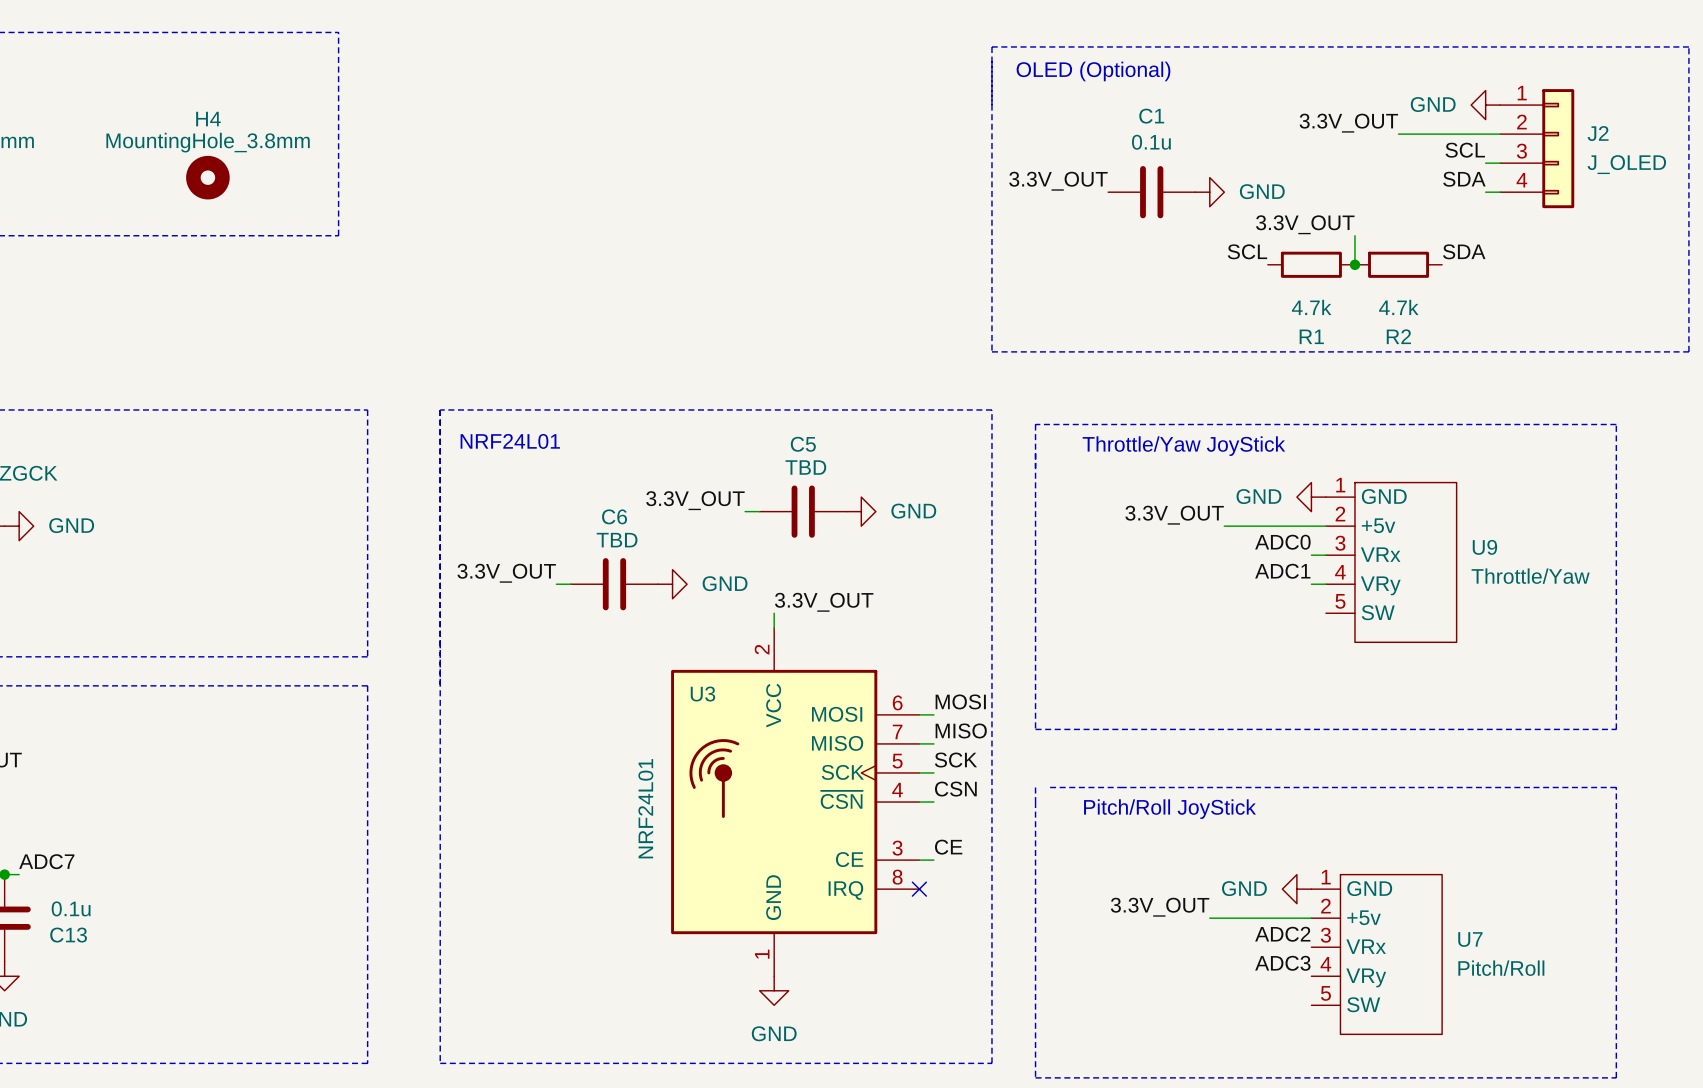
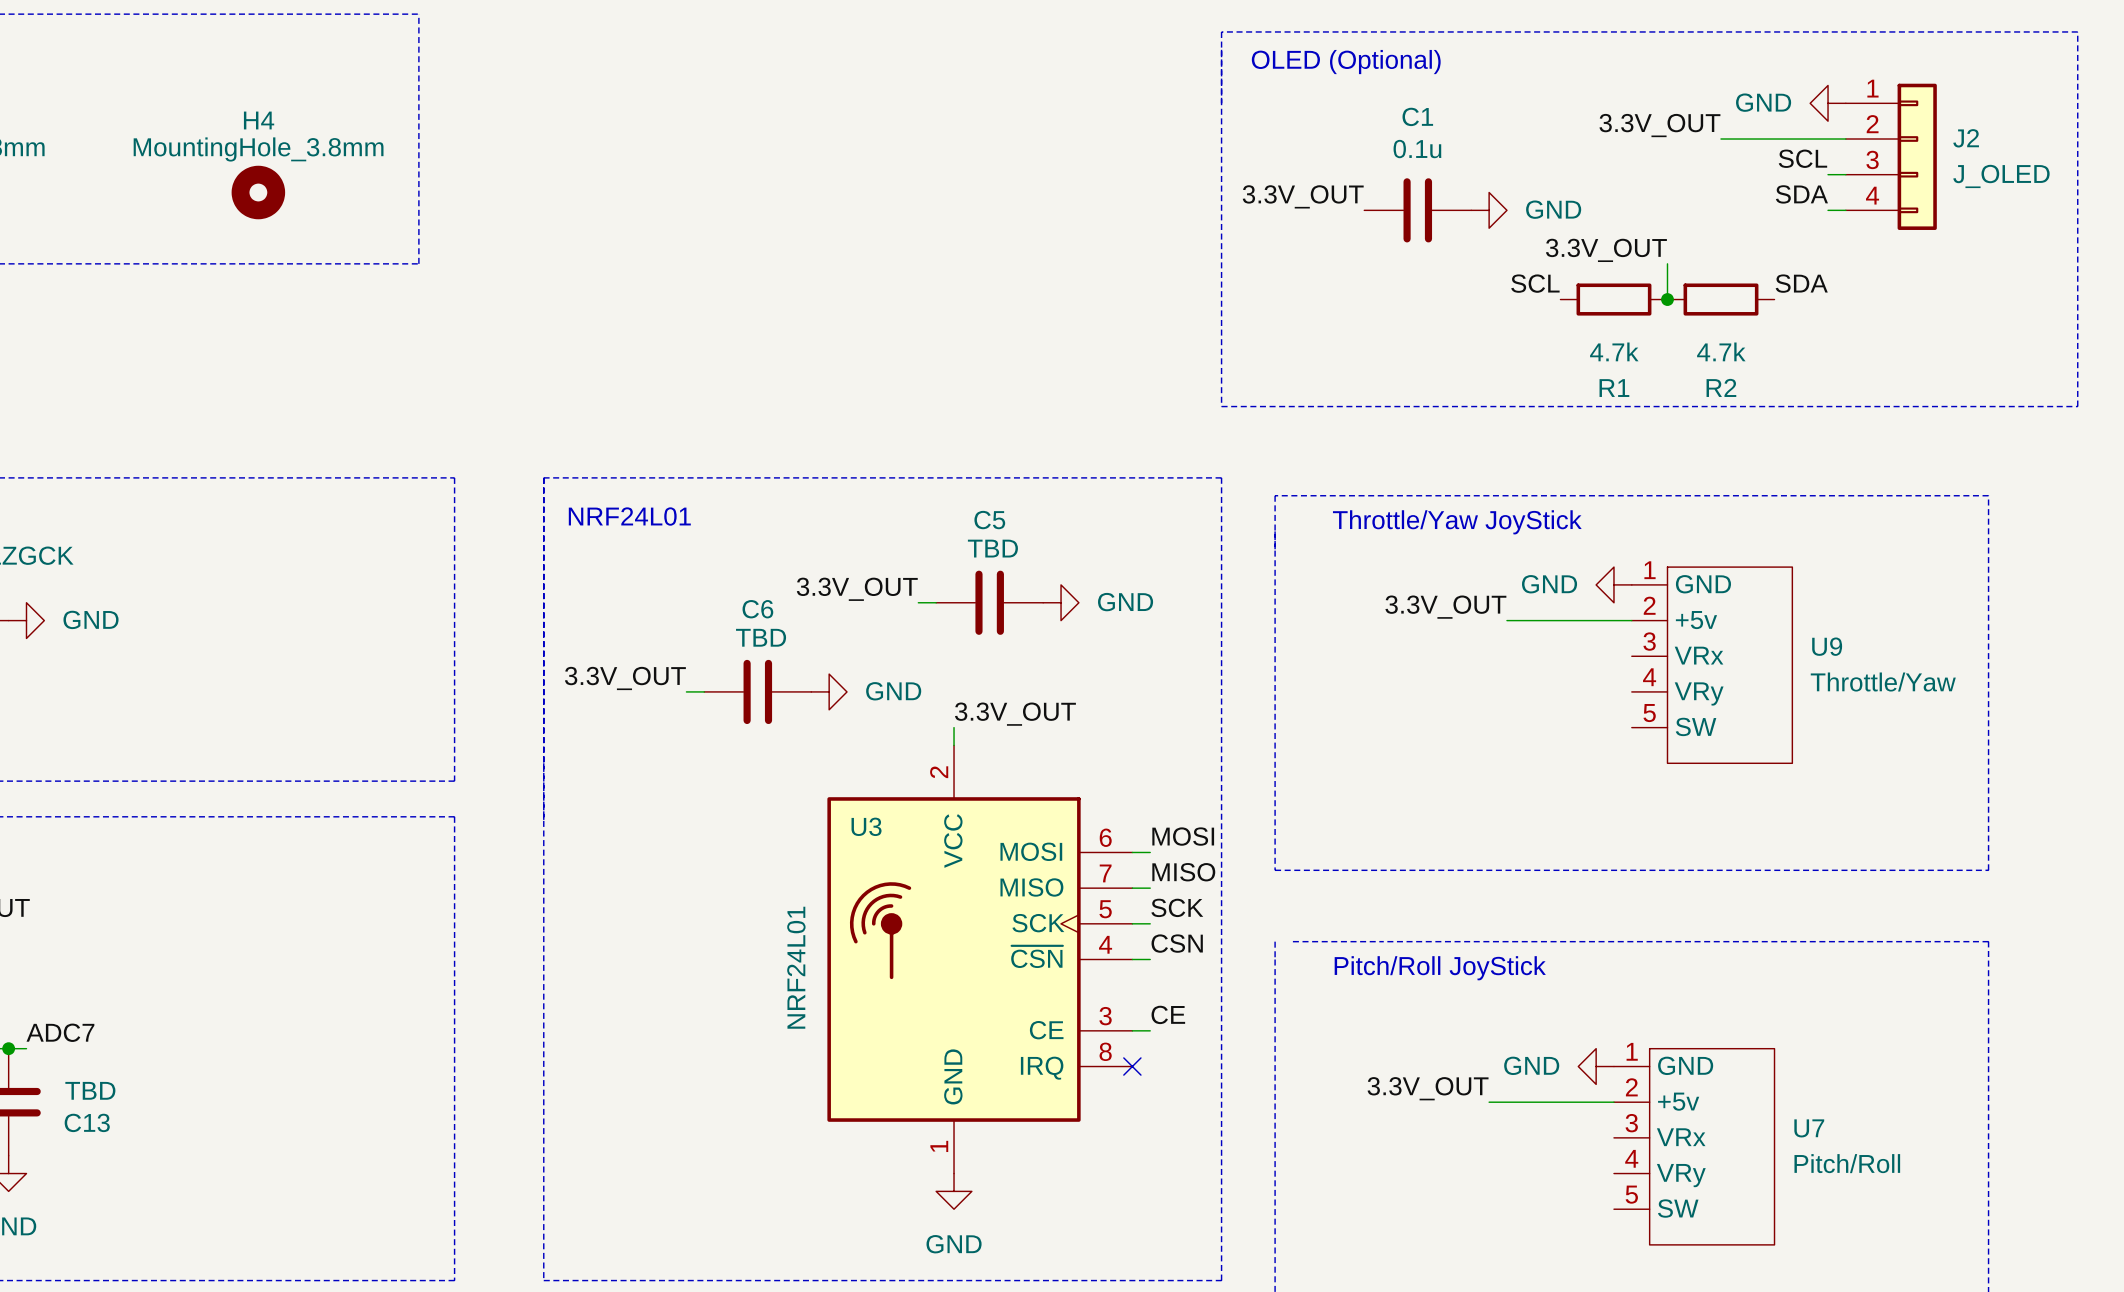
label: ADC0 (1282, 542) -> none
wire: (1311, 555) (1325, 555) -> none
label: ADC1 (1282, 571) -> none
wire: (1311, 584) (1325, 584) -> none
C13 value: 0.1u (71, 908) -> TBD (90, 1090)
label: ADC2 (1282, 934) -> none
label: ADC3 (1282, 963) -> none

